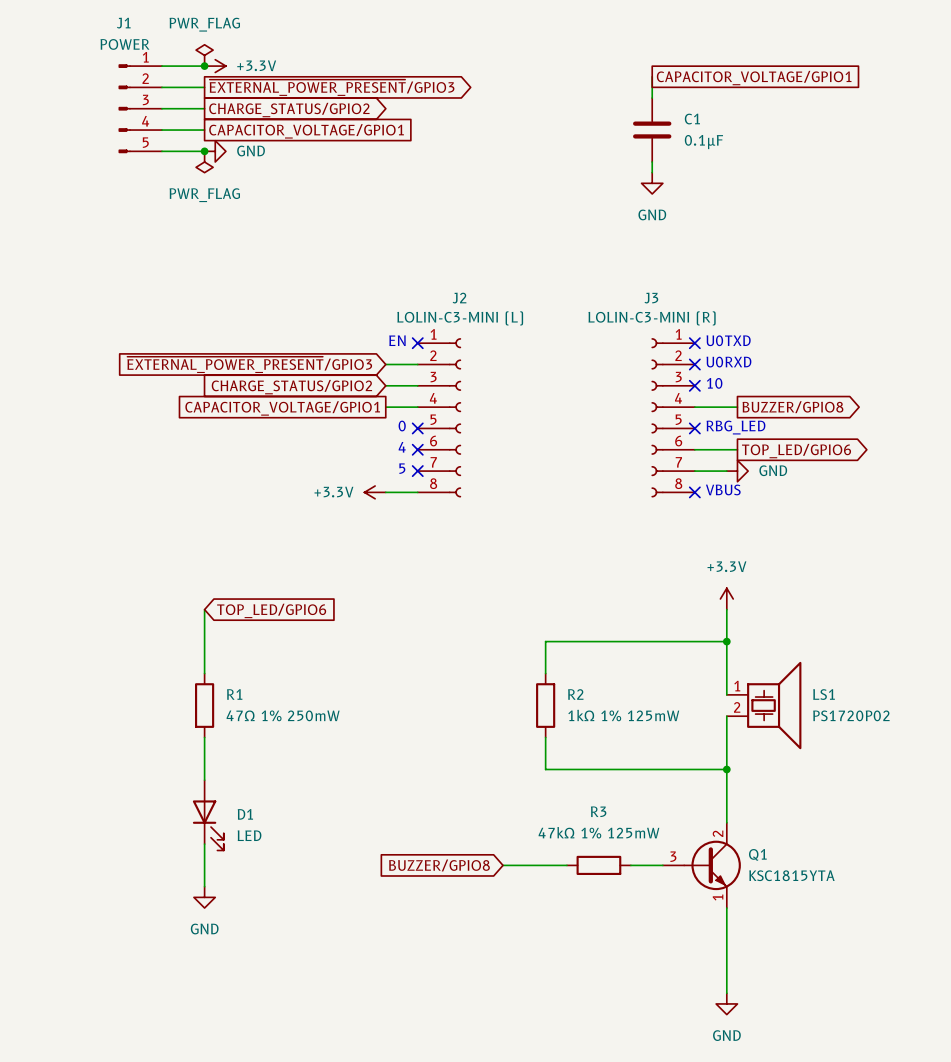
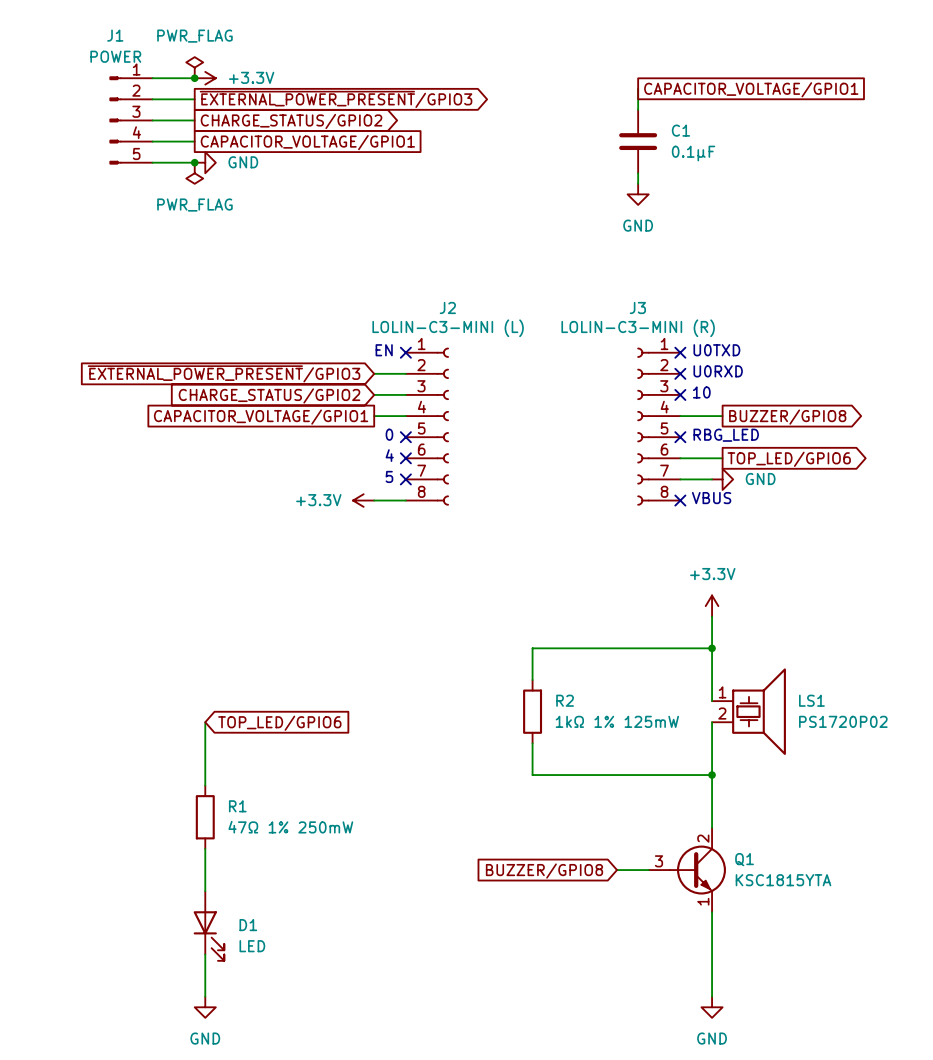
wire: (204, 609) (204, 673) -> (205, 722) (205, 785)
global label position: TOP_LED/GPIO6 (271, 610) -> TOP_LED/GPIO6 (279, 723)
R1 position: (204, 705) -> (205, 817)
wire: (204, 737) (204, 780) -> (205, 848) (205, 891)
D1 position: (208, 815) -> (208, 926)
wire: (204, 844) (204, 886) -> (205, 954) (205, 996)
global label position: BUZZER/GPIO8 (439, 865) -> BUZZER/GPIO8 (544, 871)
wire: (503, 865) (566, 865) -> none
R3: 47kΩ 1% 125mW (598, 865) -> none
power symbol position: GND (204, 897) -> GND (205, 1007)

